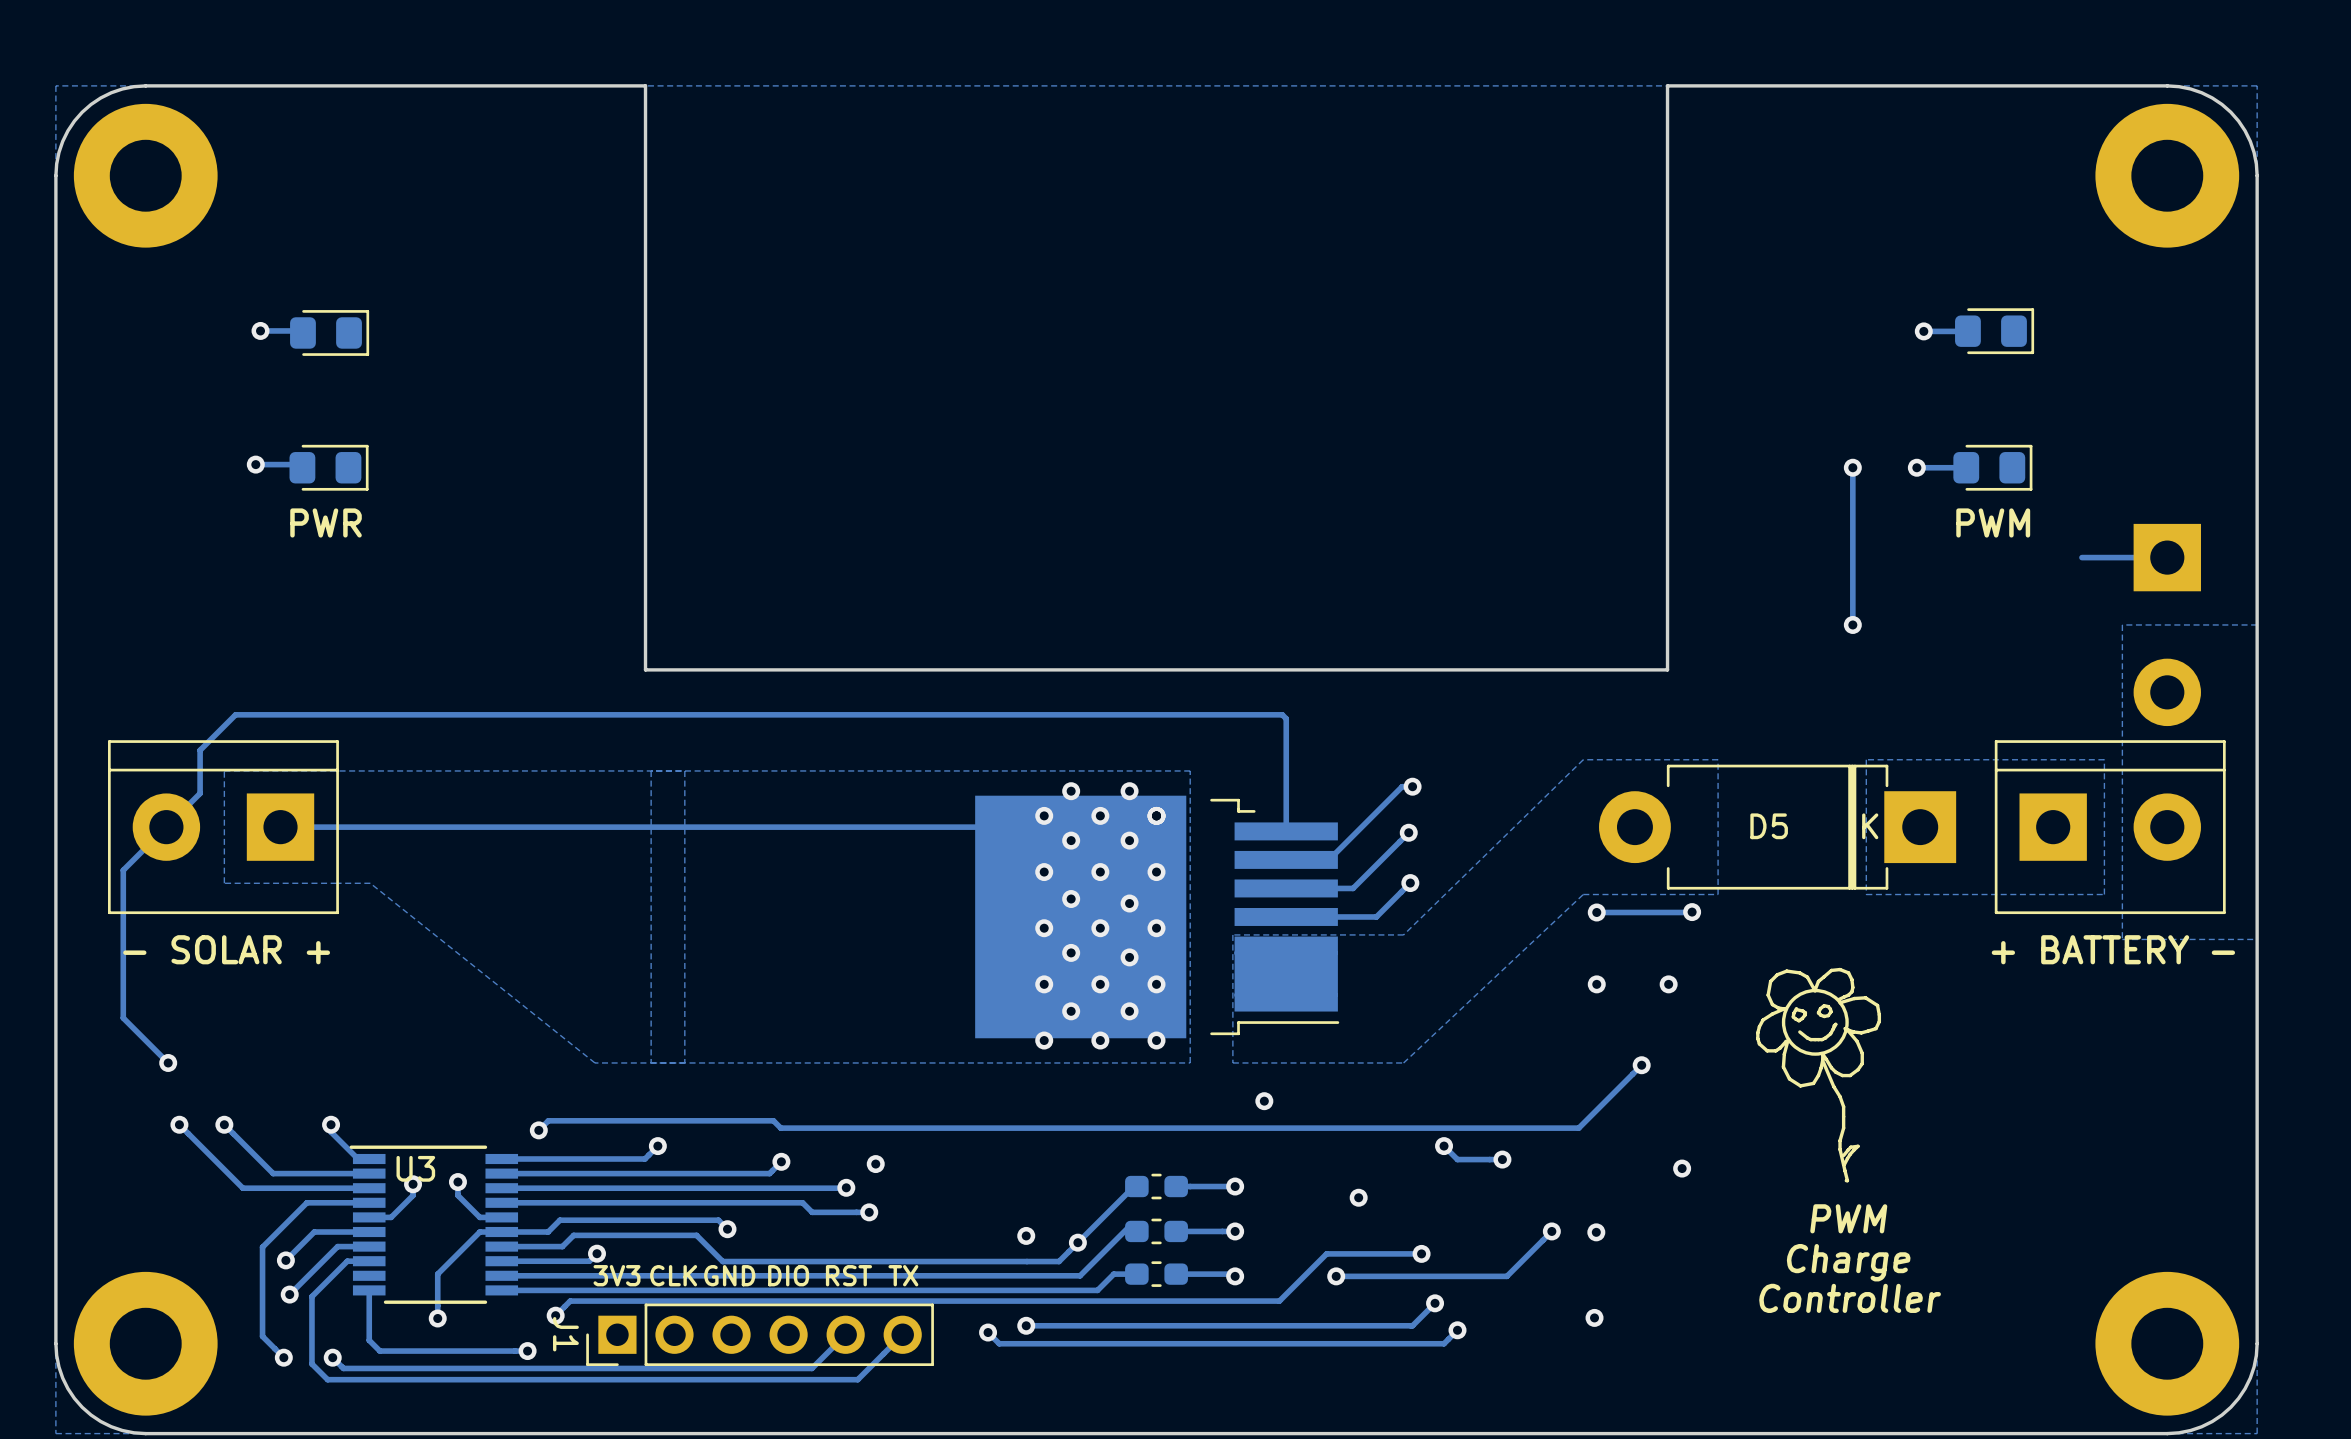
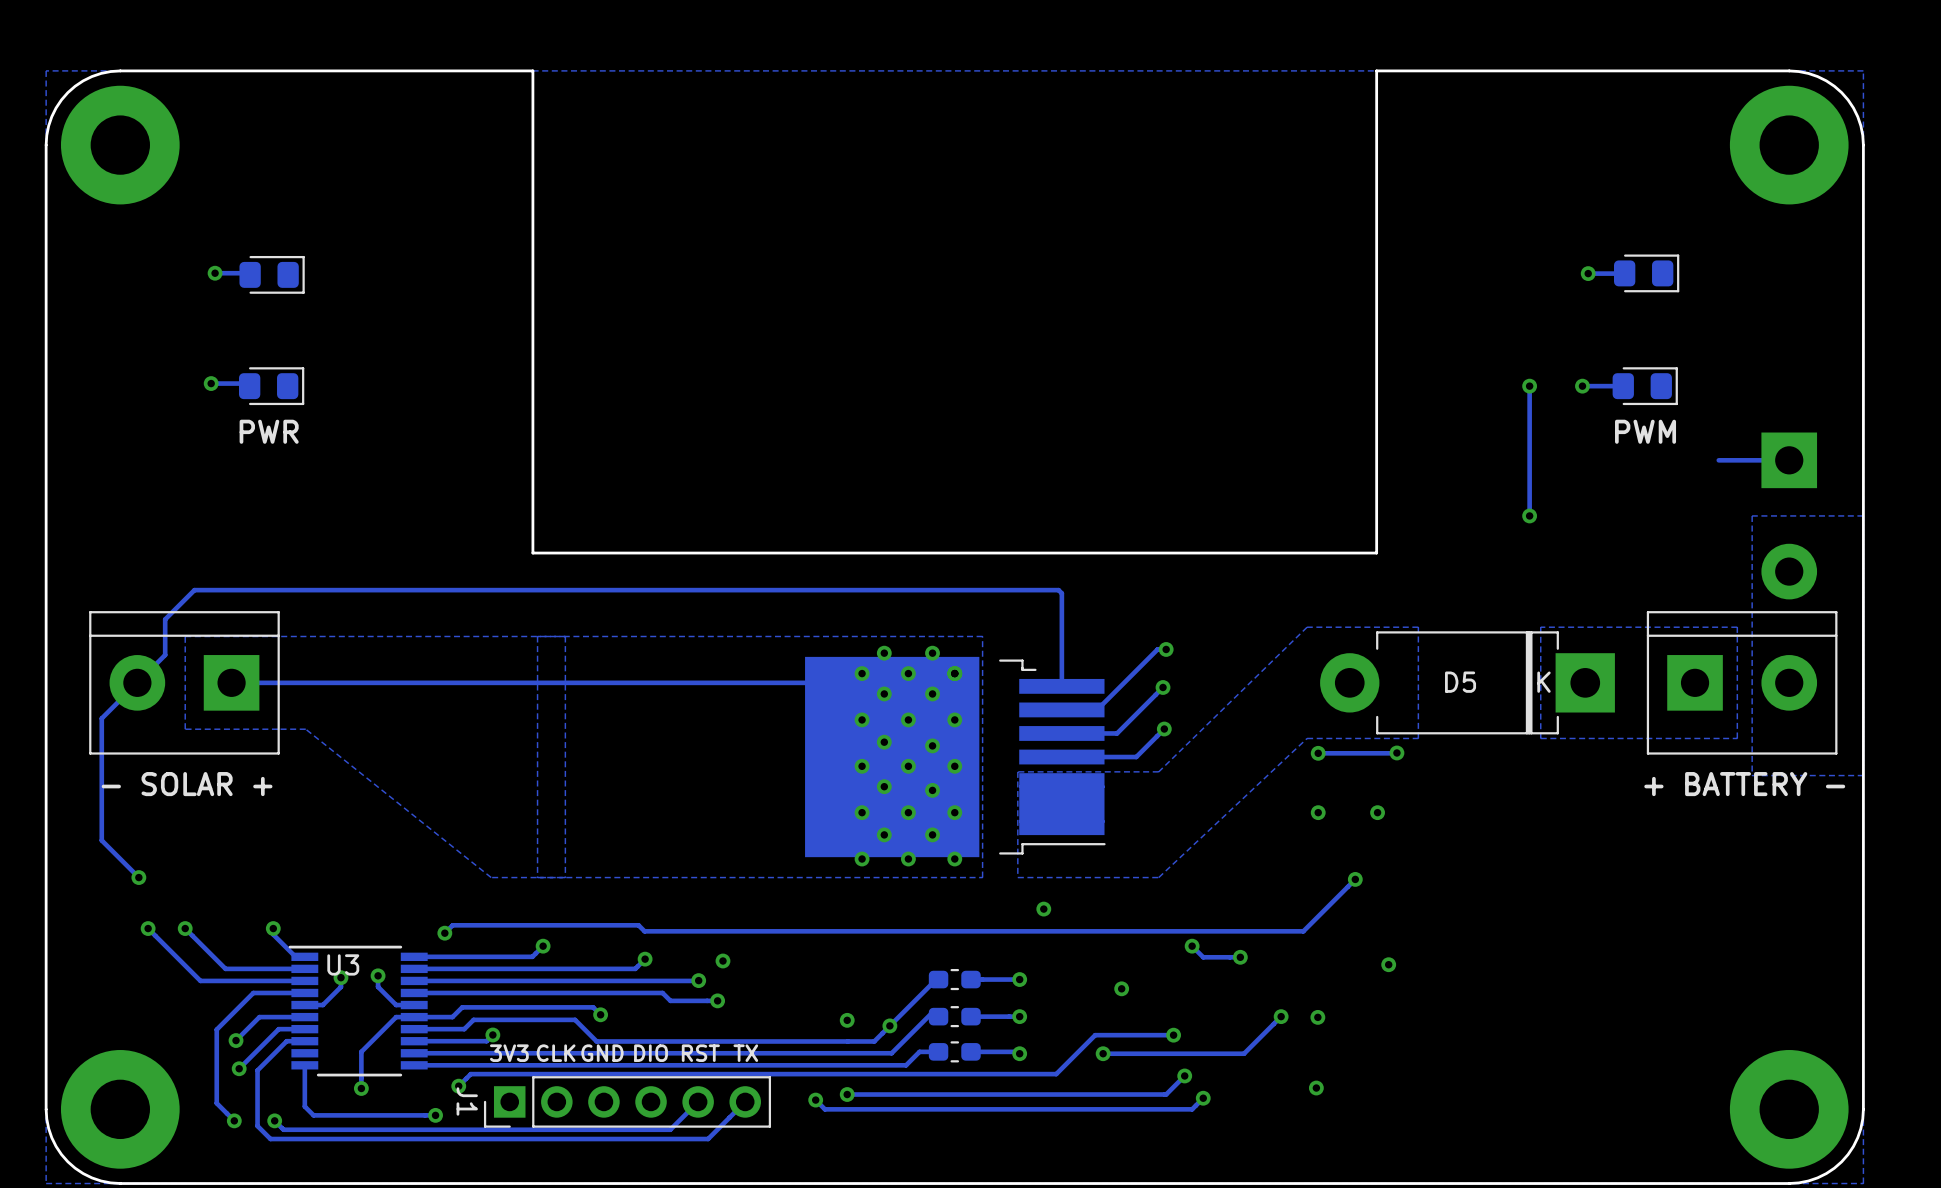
drawing: [1756, 967, 1882, 1183] -> none
text: PWM (1848, 1218) -> none
text: Charge (1848, 1262) -> none
text: Controller (1850, 1298) -> none

